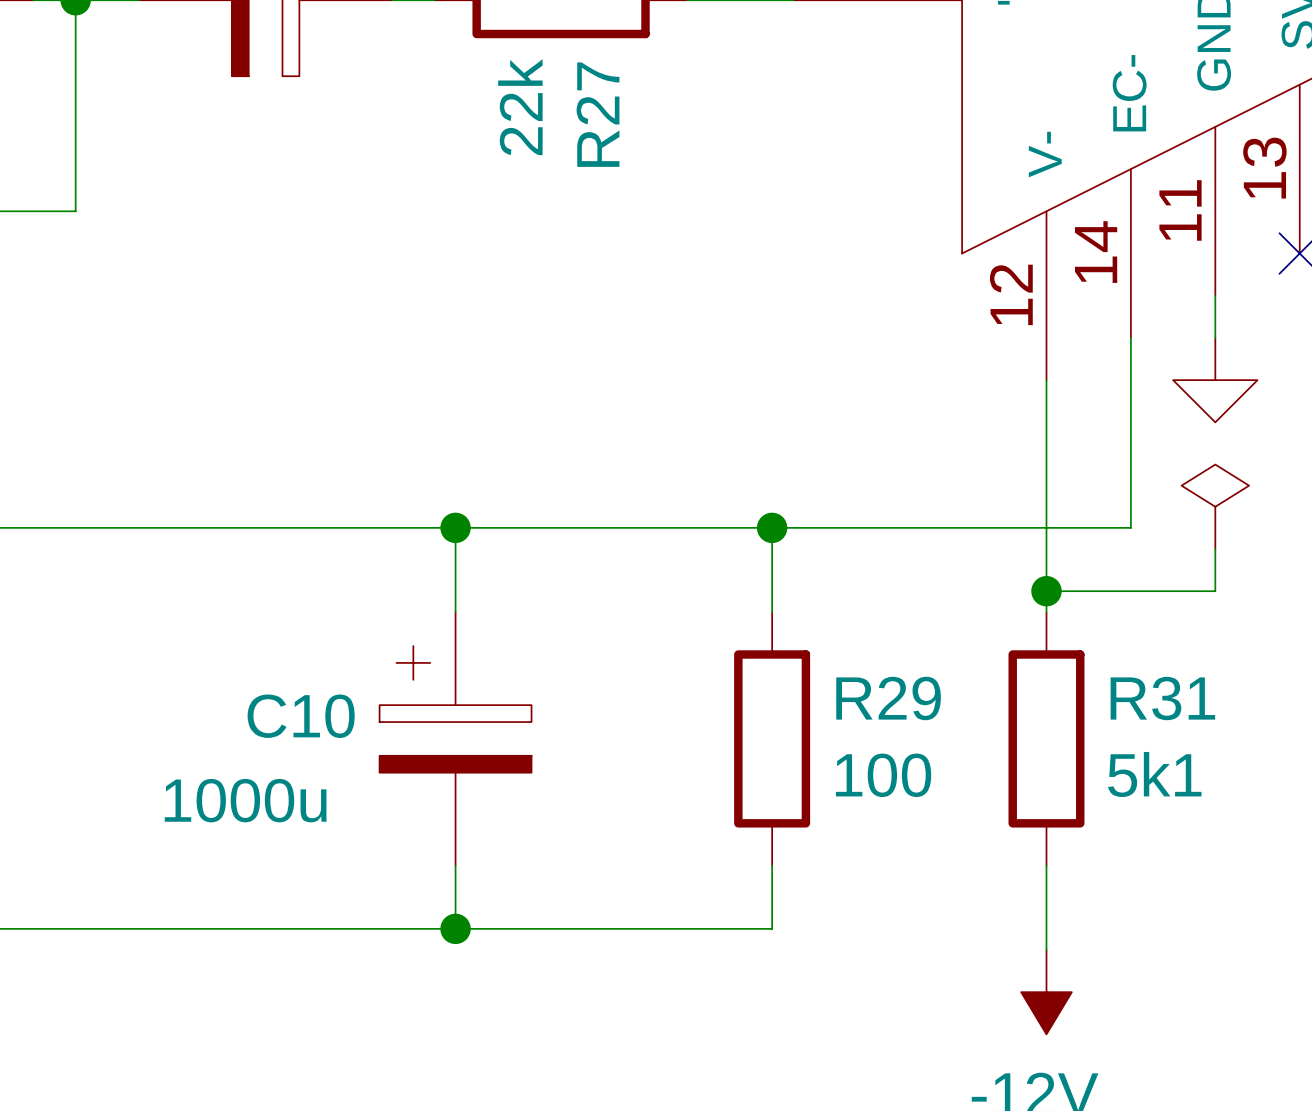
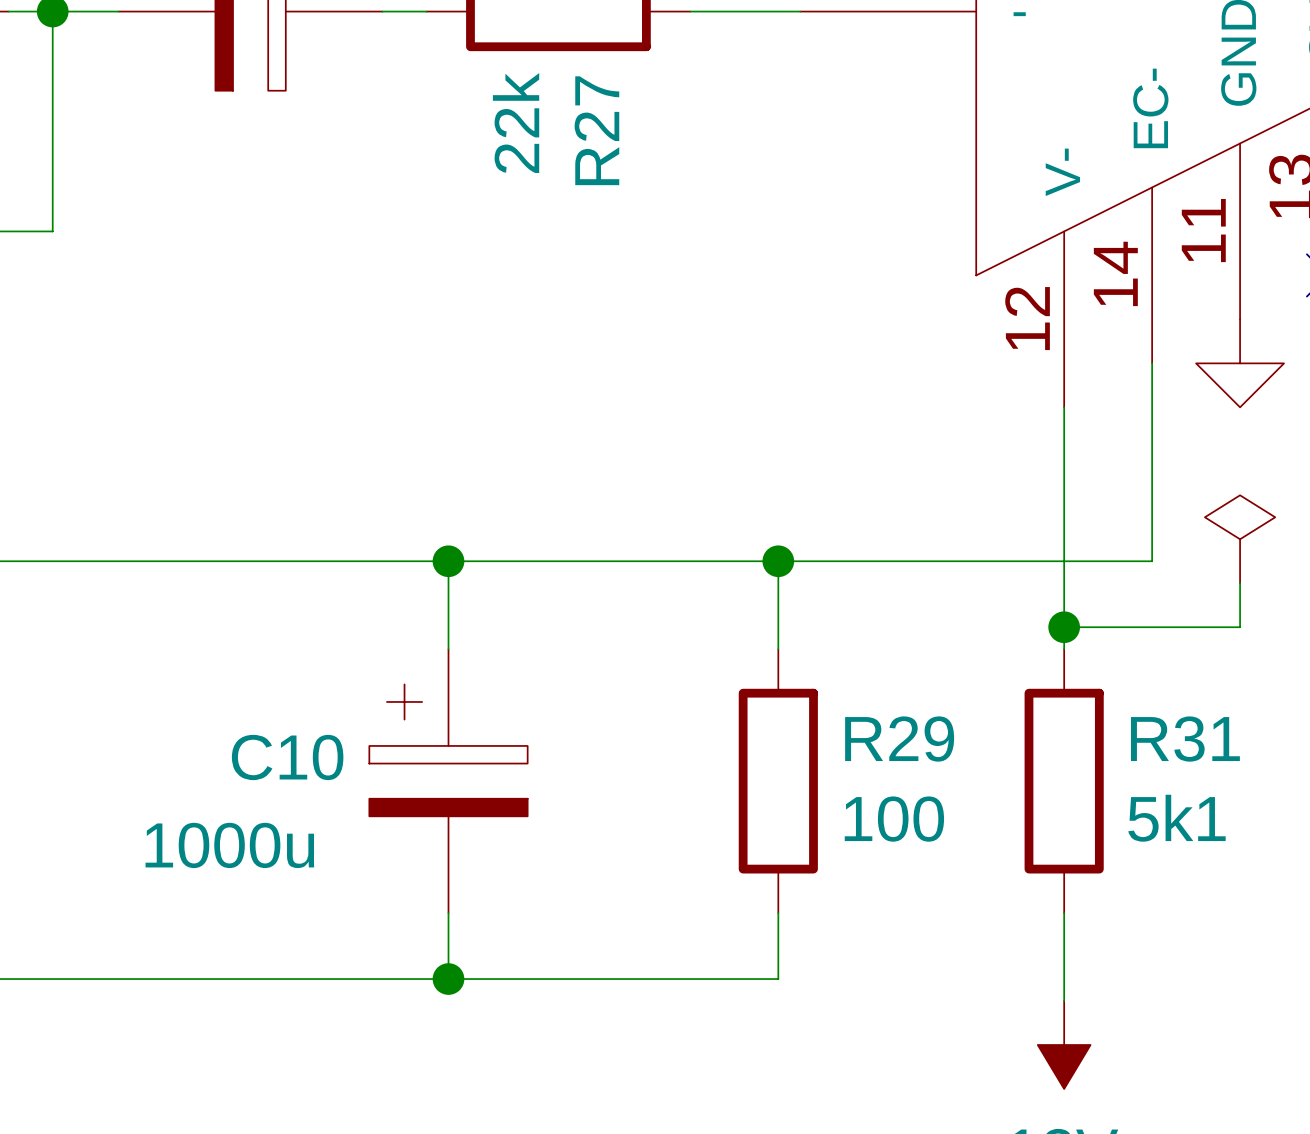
power symbol position: (1215, 380) -> (1240, 363)

